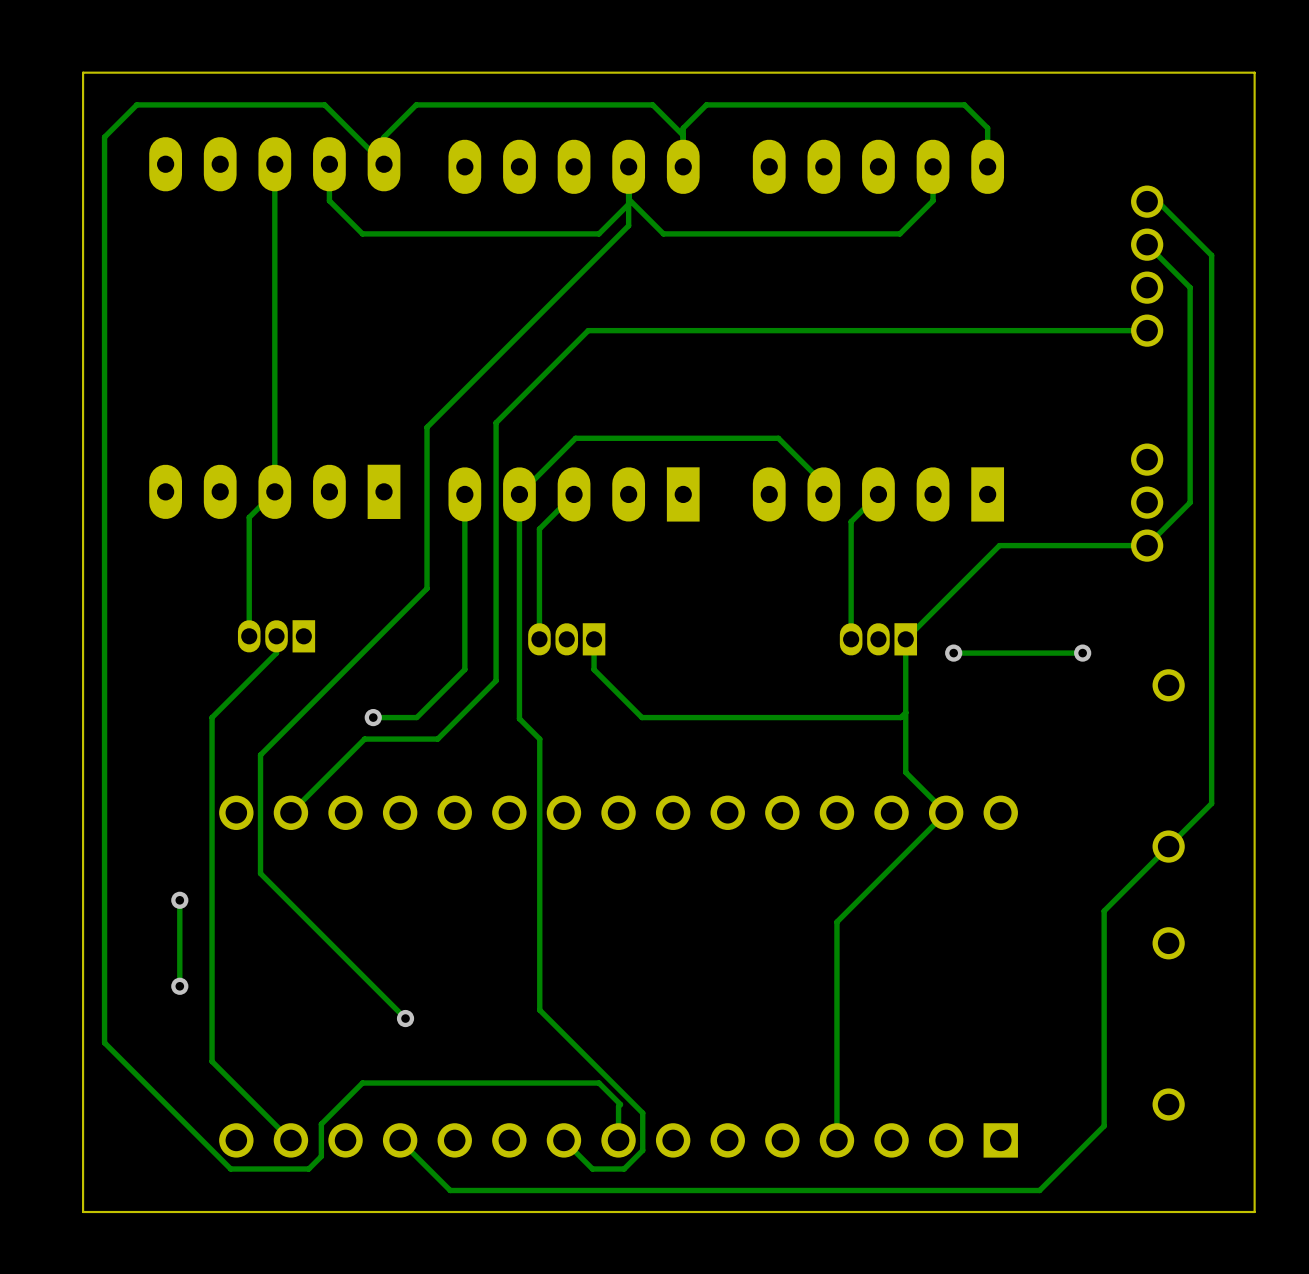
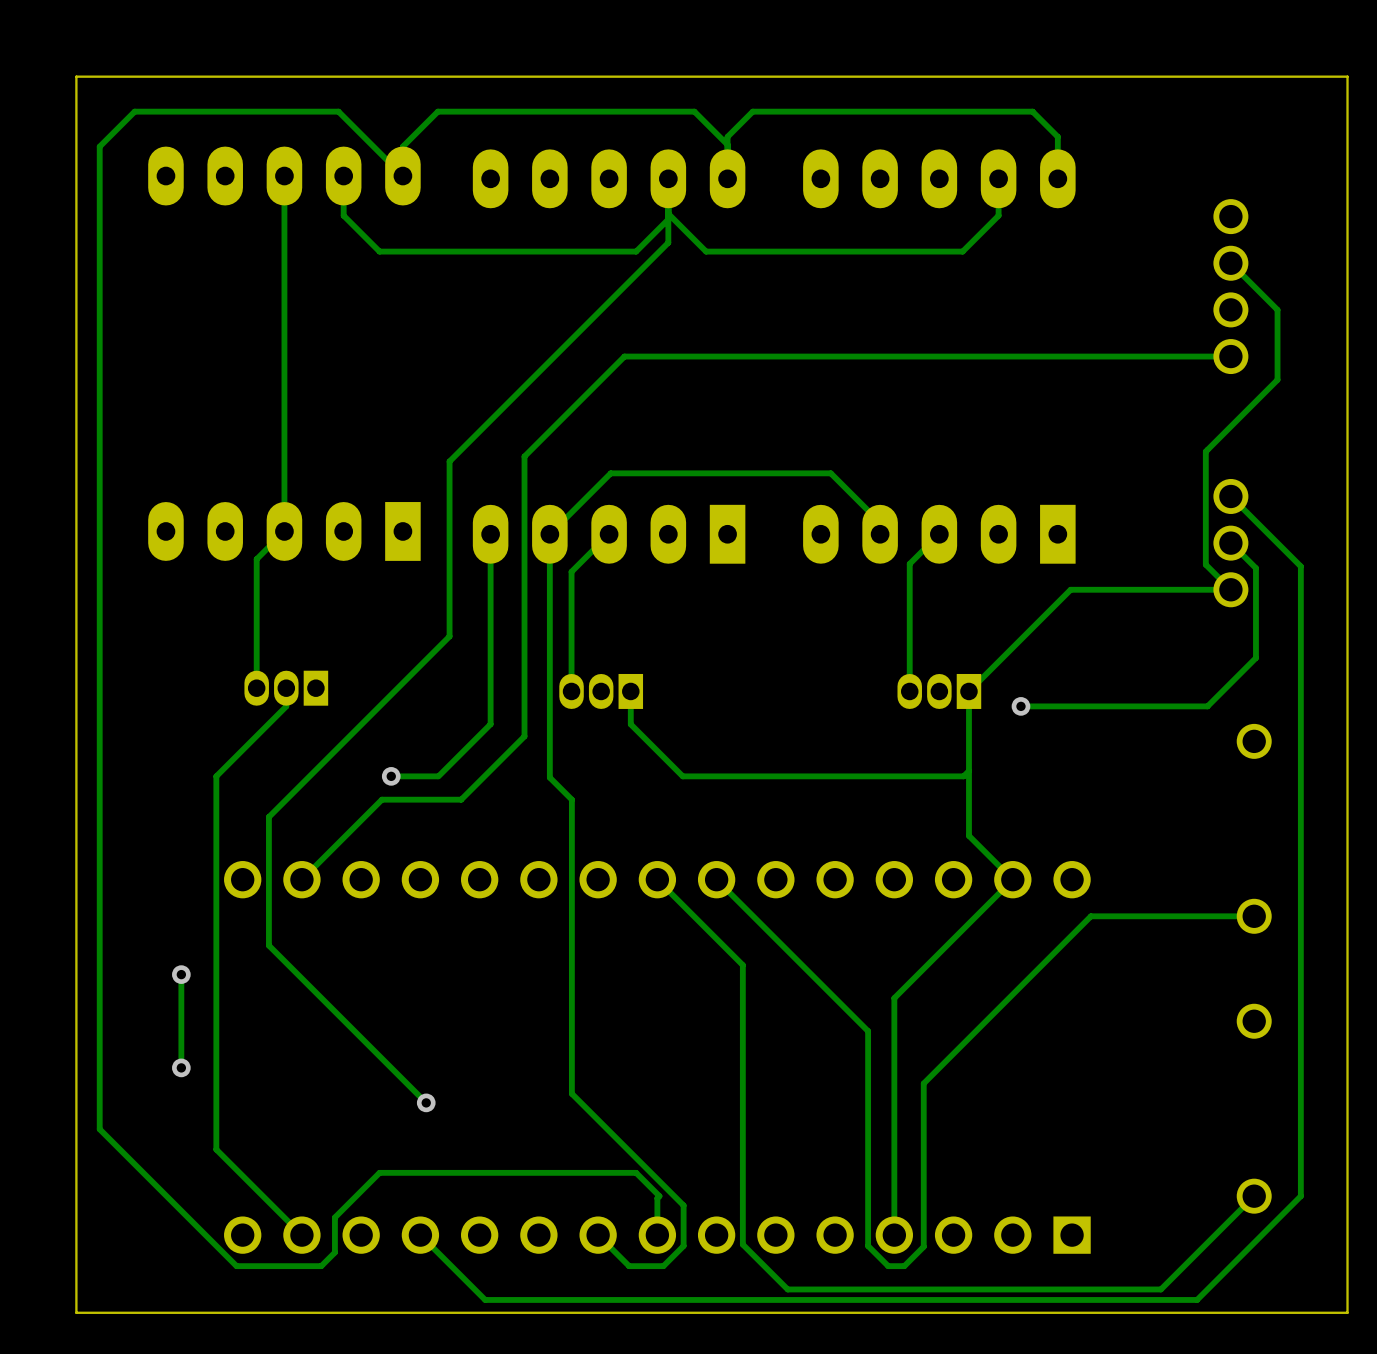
track: (1147, 190) (1211, 255) (1211, 524) -> (1230, 496) (1300, 566)
track: (1190, 352) (1190, 502) (1147, 545) -> (1277, 379) (1205, 451) (1205, 564) (1230, 589)
track: none -> (1230, 543) (1255, 568) (1255, 657) (1207, 706) (1160, 706)
via: (1082, 653) -> none
track: (1211, 803) (1104, 911) (1104, 1126) (1039, 1190) -> (1254, 1196) (1160, 1289) (1114, 1289)
track: none -> (1300, 869) (1300, 1196) (1197, 1299) (485, 1299) (474, 1289)
track: none -> (716, 879) (868, 1031) (868, 1245) (888, 1266) (904, 1266) (923, 1246) (923, 1083) (1090, 916) (1254, 916)
track: (738, 1190) (450, 1190) -> (787, 1289) (742, 1244) (742, 965) (657, 879)

